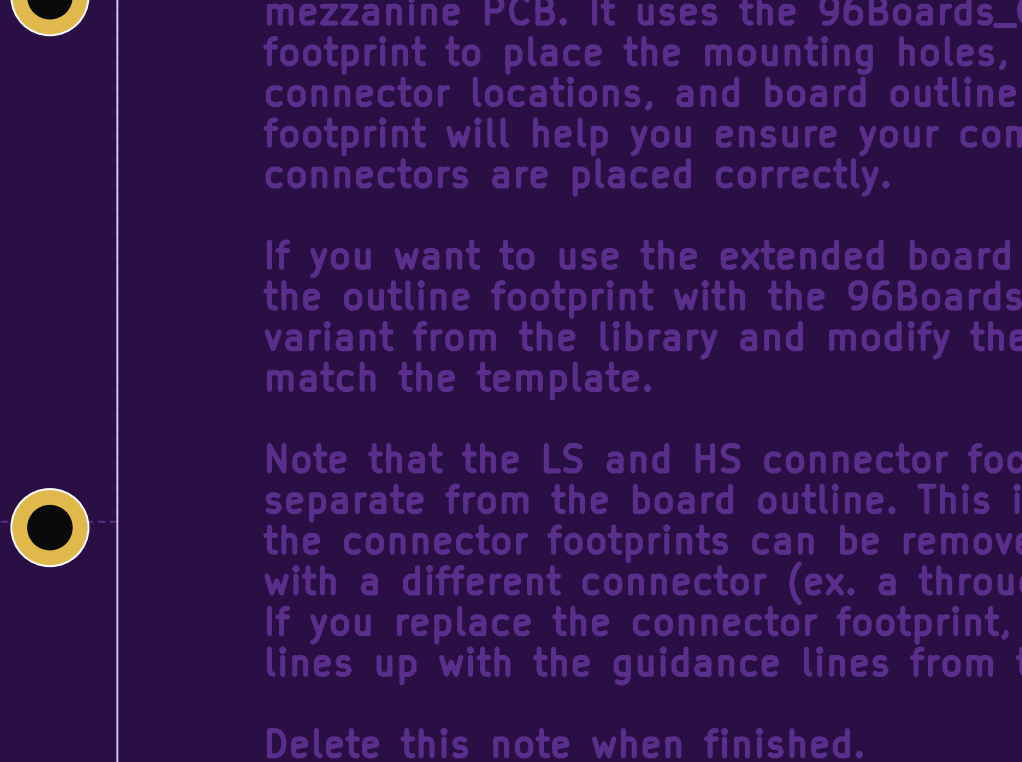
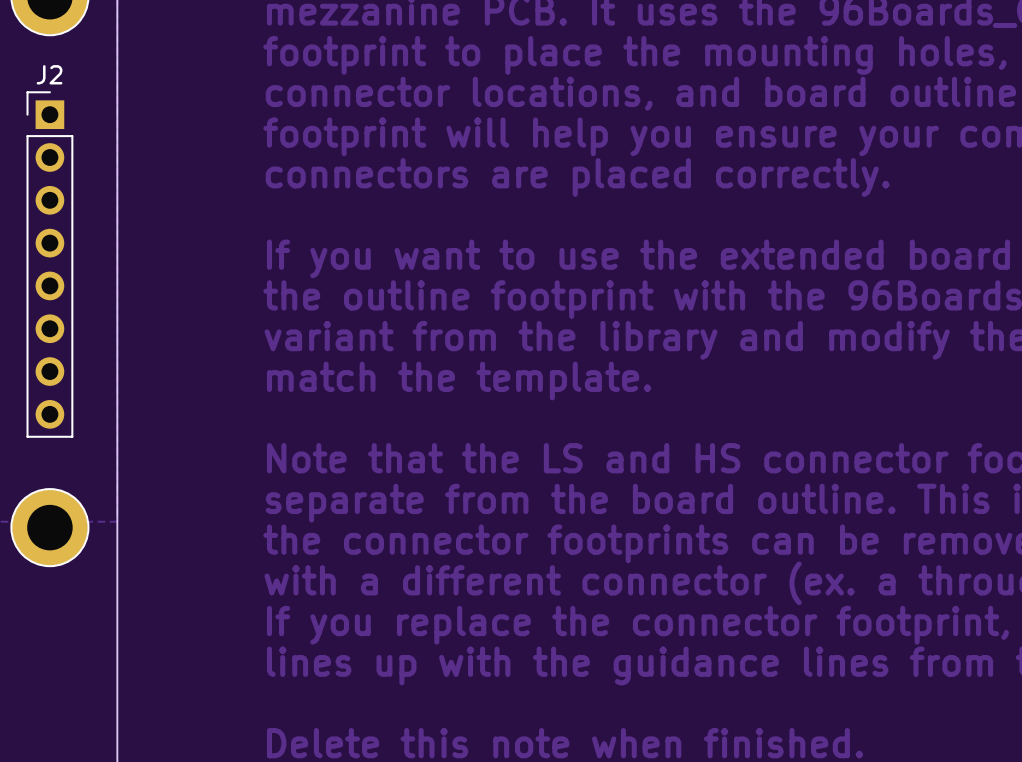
J2: none -> (49, 264)

